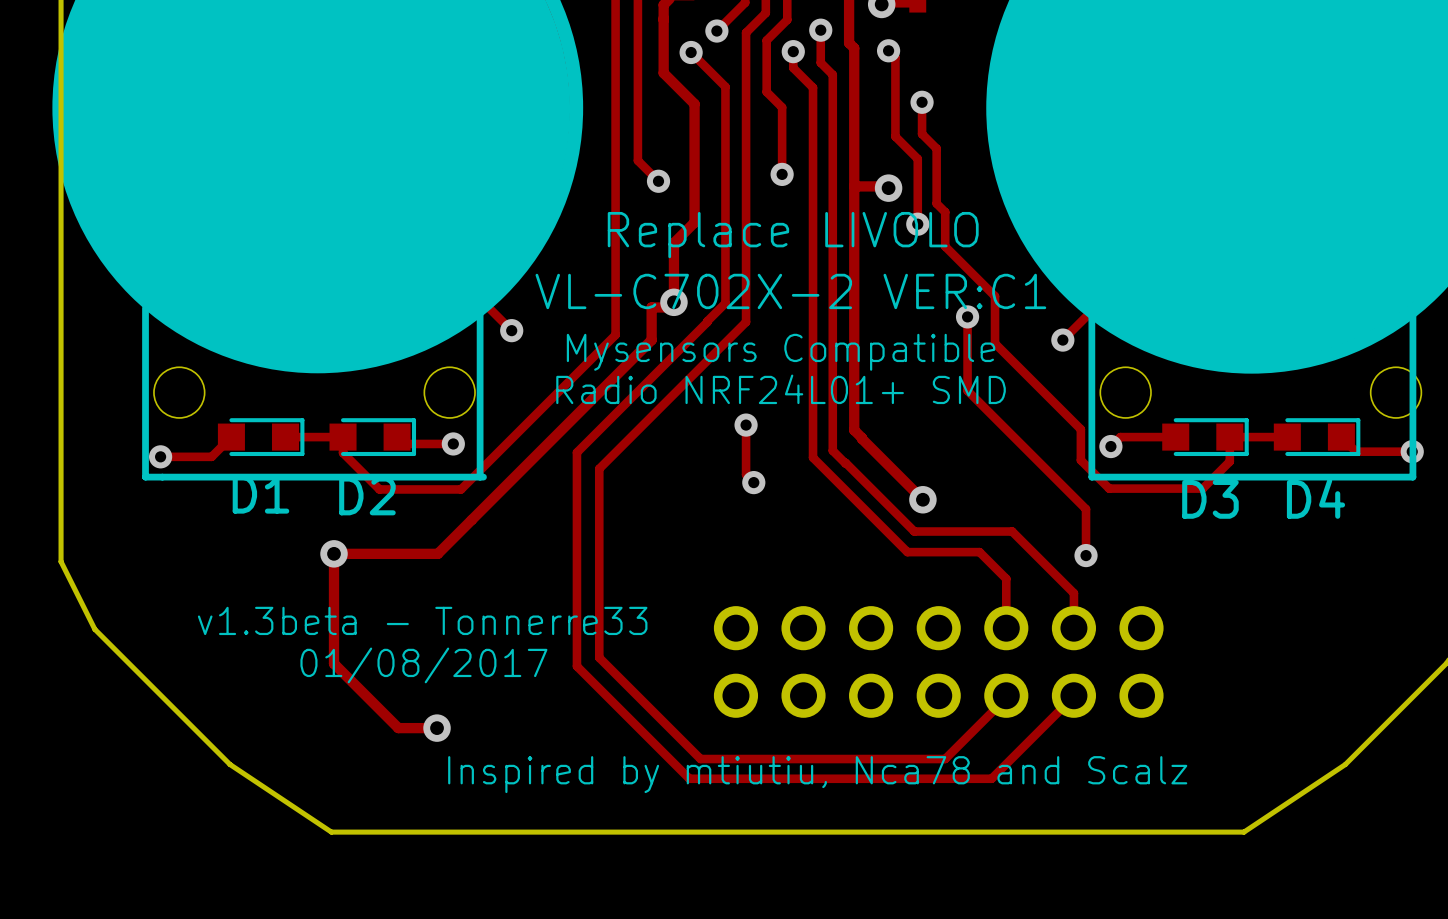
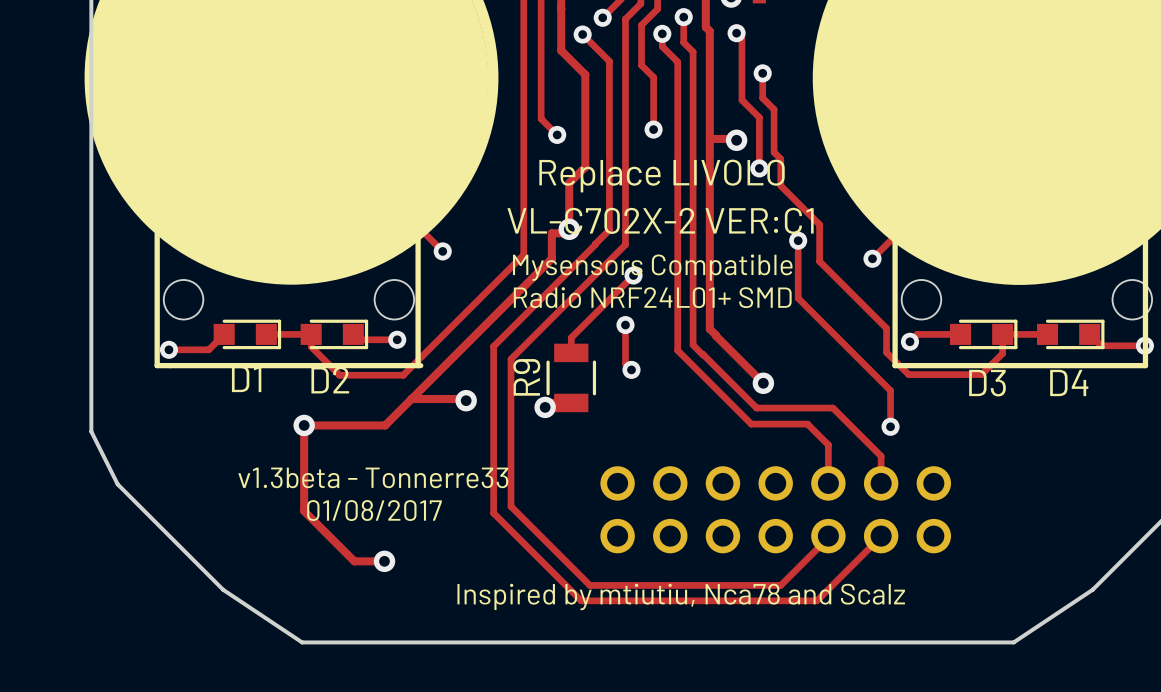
track: none -> (633, 275) (571, 337) (571, 352)
via: none -> (633, 275)
R9: none -> (571, 377)
track: none -> (411, 399) (464, 399) (466, 400)
via: none -> (466, 400)
via: none -> (545, 407)

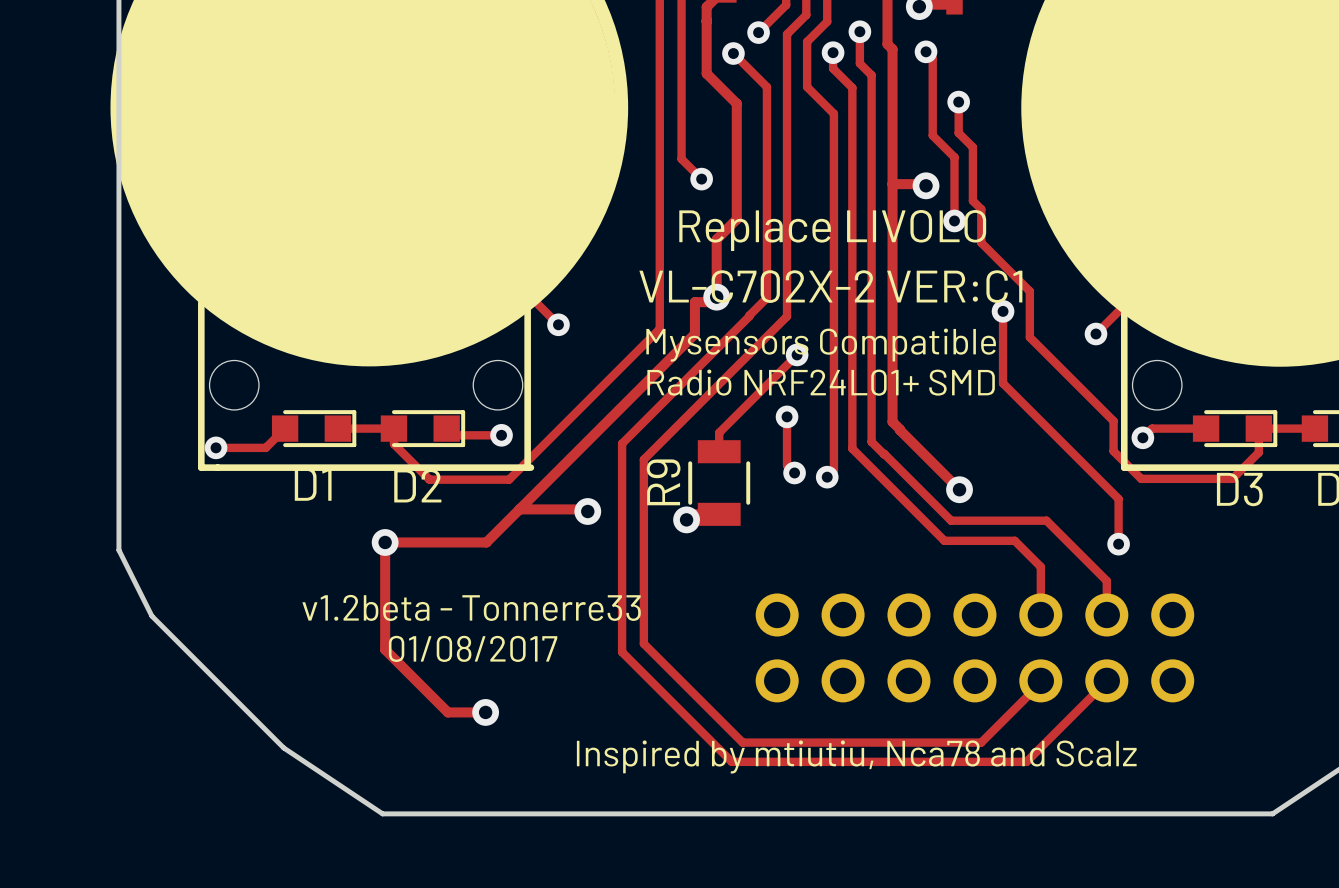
track: (641, 61) (641, 65) (653, 77) (653, 129) -> (807, 87) (833, 113) (833, 470) (827, 477) (823, 472)
via: (653, 129) -> none
via: none -> (827, 477)
text: v1.3beta - Tonnerre33 (373, 477) -> v1.2beta - Tonnerre33 (471, 607)

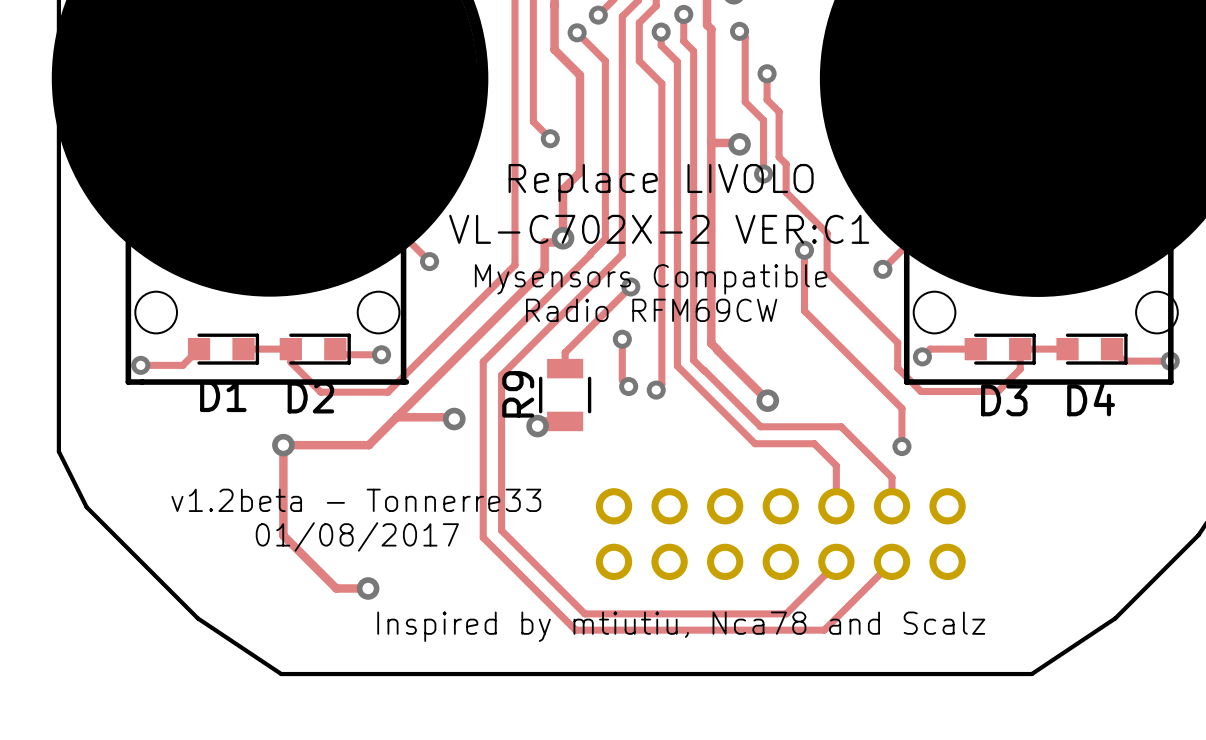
text: Radio NRF24L01+ SMD (821, 382) -> Radio RFM69CW (651, 310)

